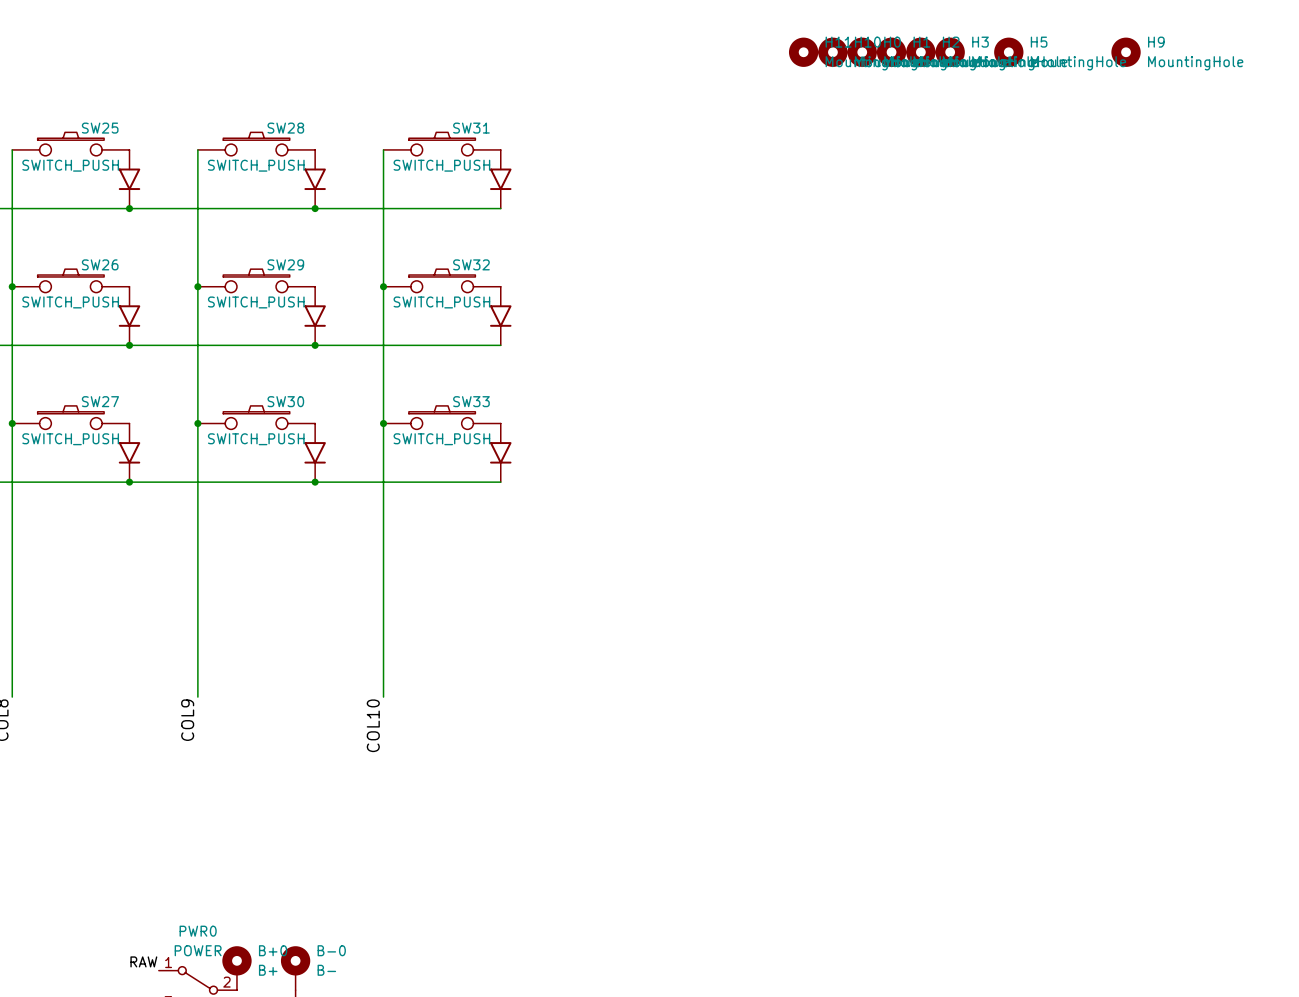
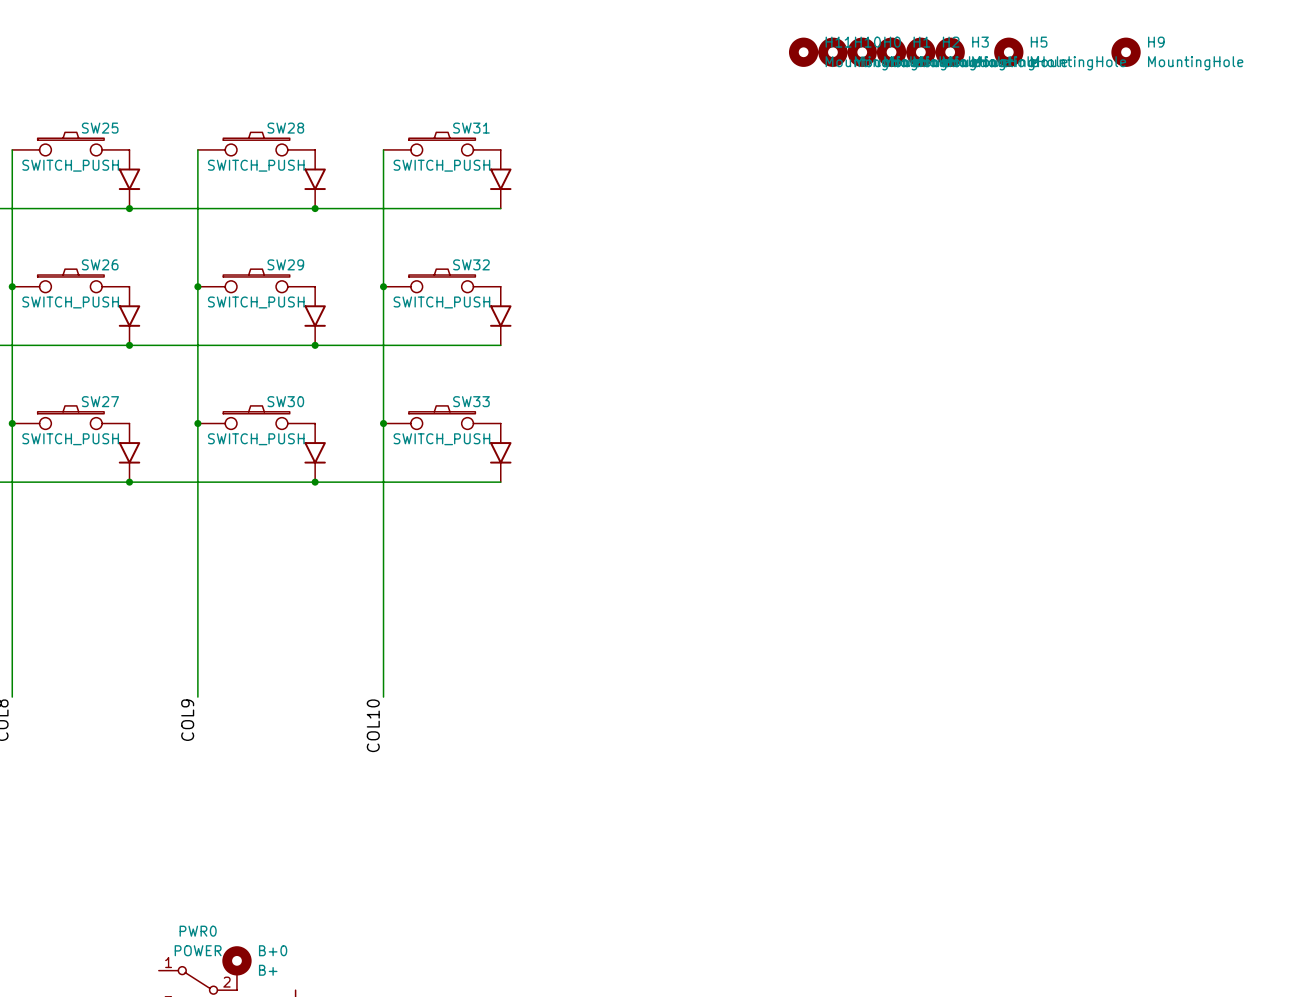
label: RAW (143, 961) -> none
B-0: B- (295, 968) -> none

